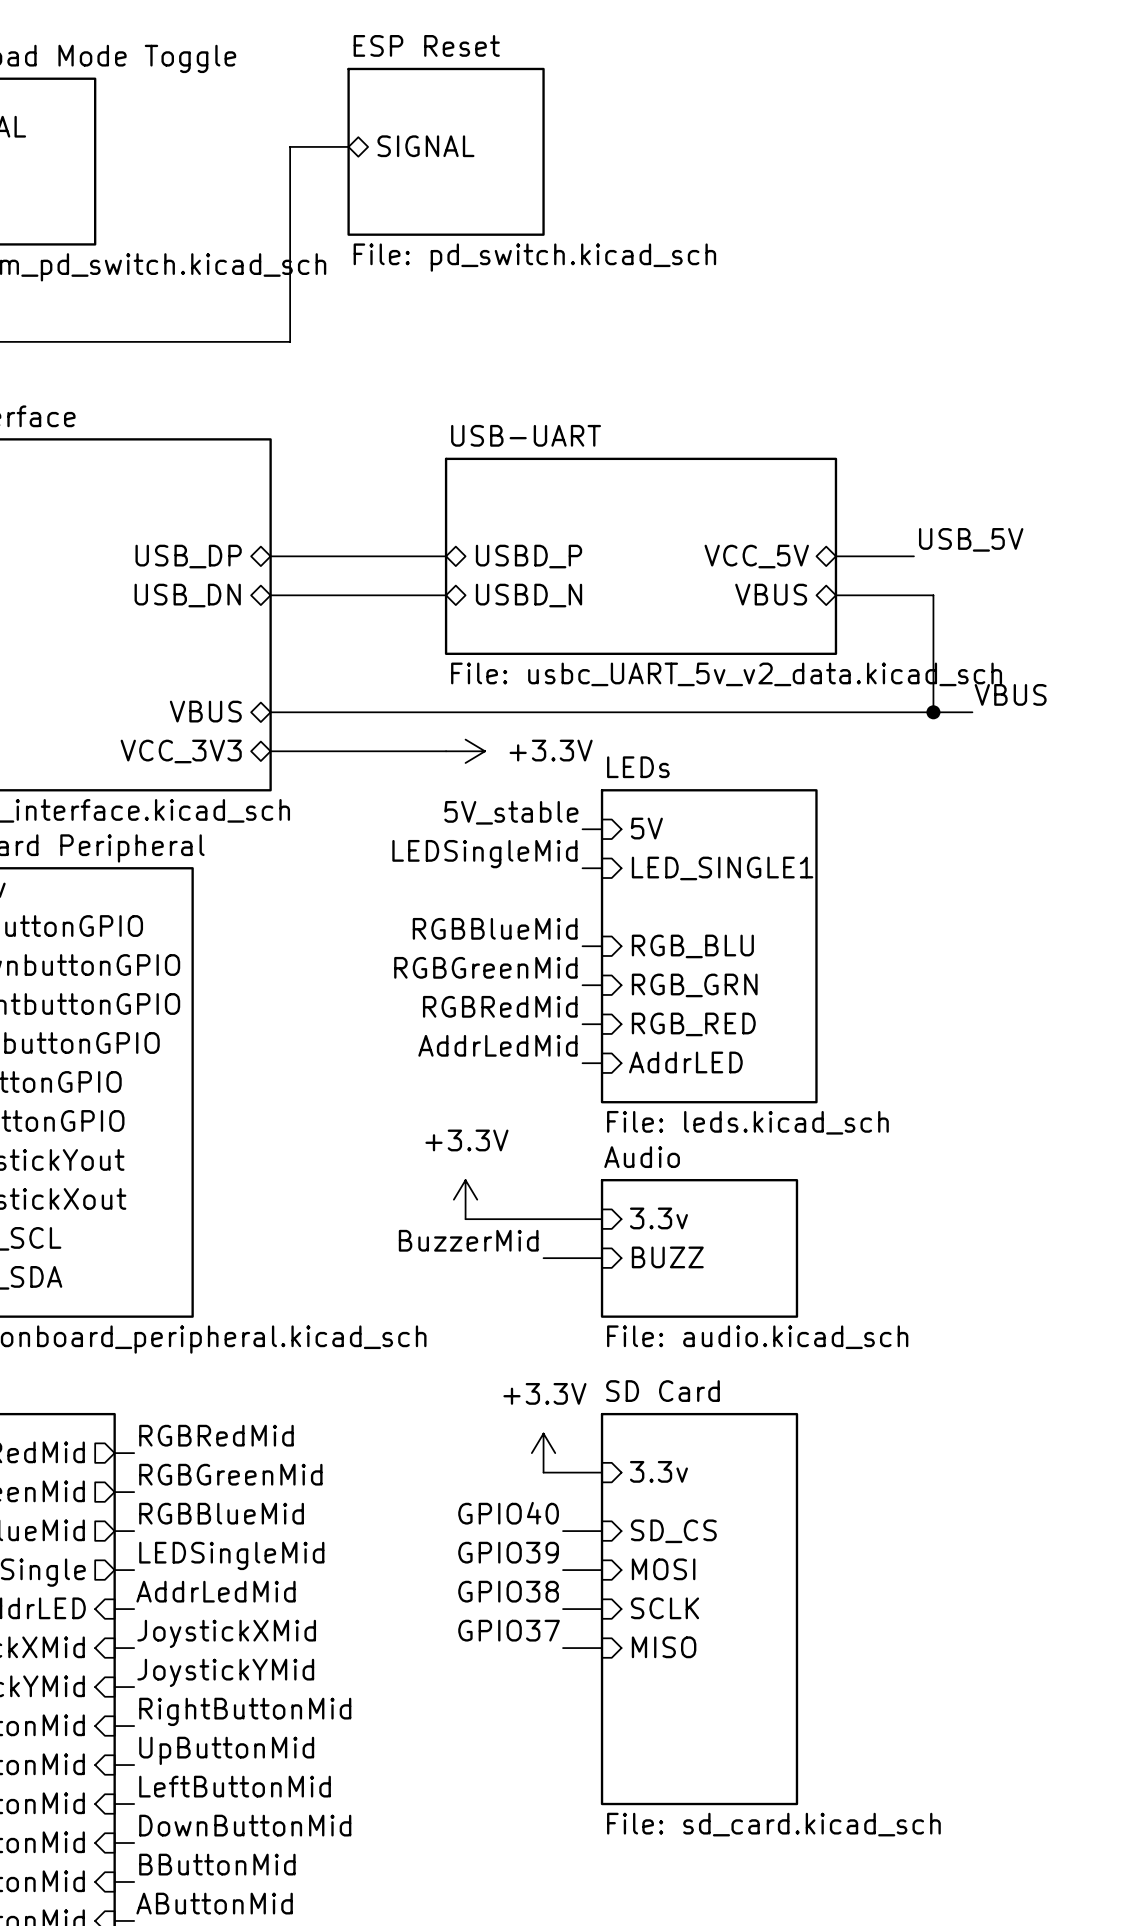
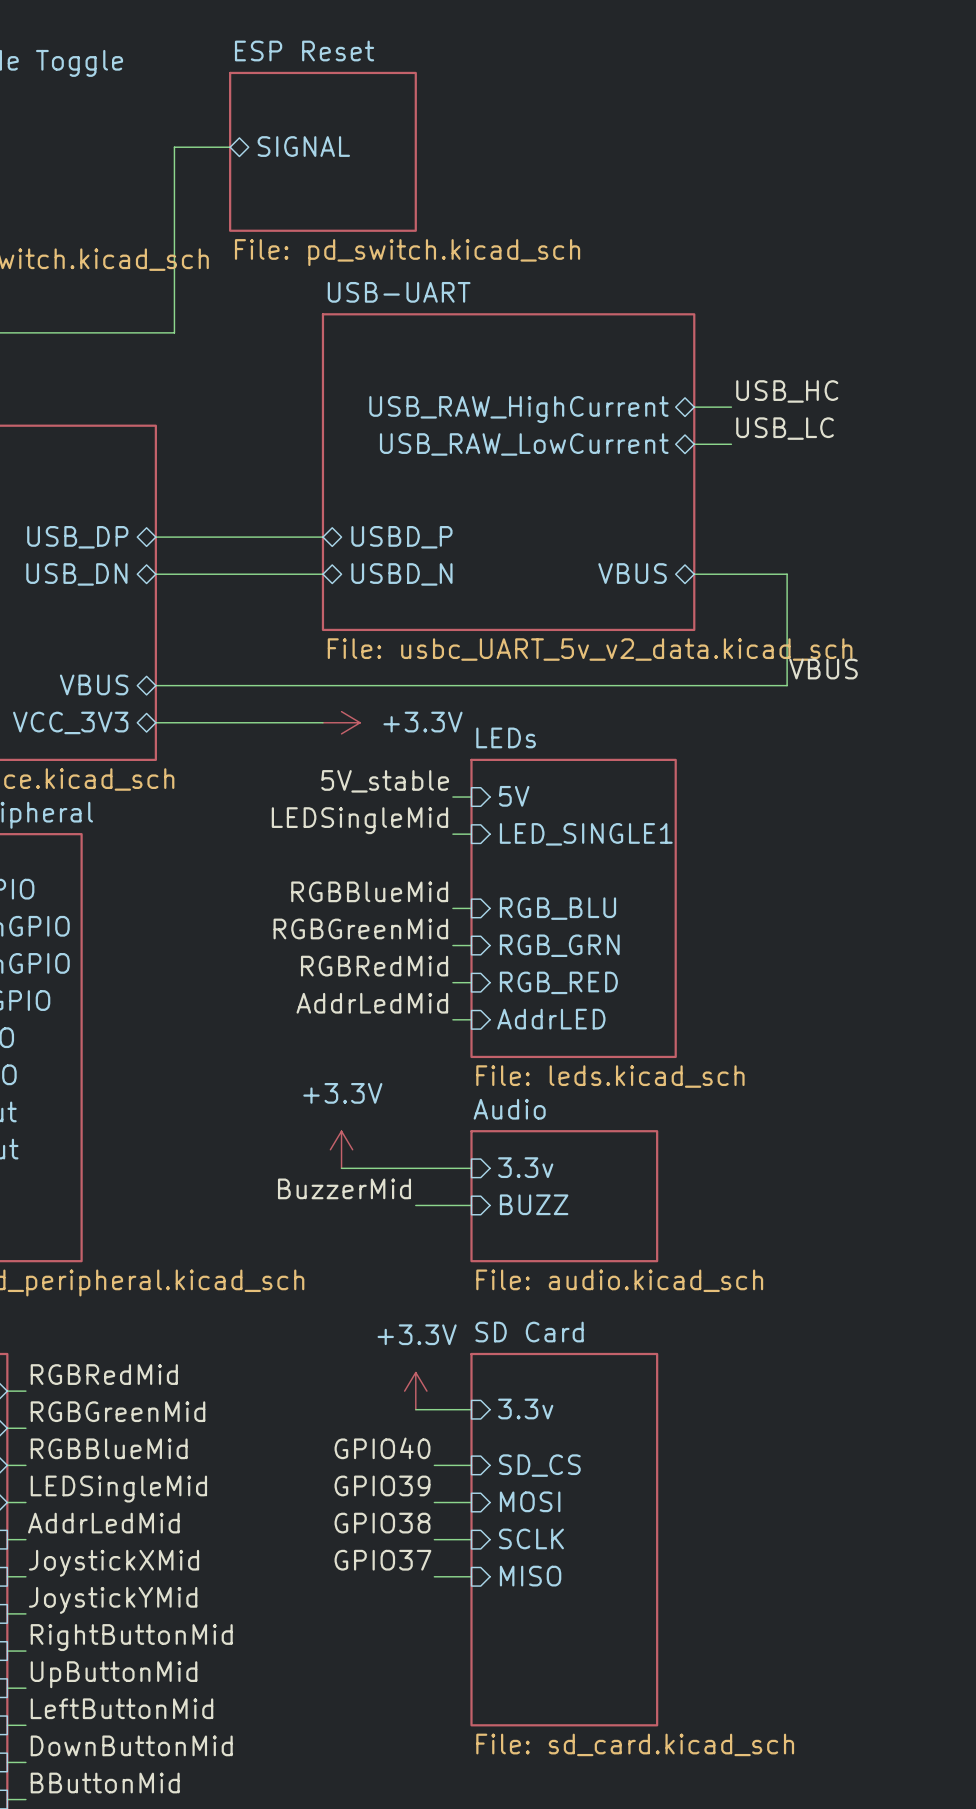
label: none -> USB_HC (787, 391)
wire: none -> (694, 407) (731, 407)
sheet pin: none -> USB_RAW_HighCurrent (518, 409)
label: none -> USB_LC (785, 428)
sheet pin: none -> USB_RAW_LowCurrent (524, 444)
sheet USB-UART: none -> File: usbc_UART_5v_v2_data.kicad_sch (508, 472)
label: USB_5V (971, 539) -> none
sheet USB-UART: File: usbc_UART_5v_v2_data.kicad_sch (641, 556) -> none
sheet pin: VCC_5V (756, 556) -> none
wire: (835, 556) (913, 556) -> none
label position: VBUS (1010, 694) -> VBUS (823, 669)
wire: (933, 712) (972, 712) -> (694, 444) (731, 444)
junction: (933, 712) -> none

